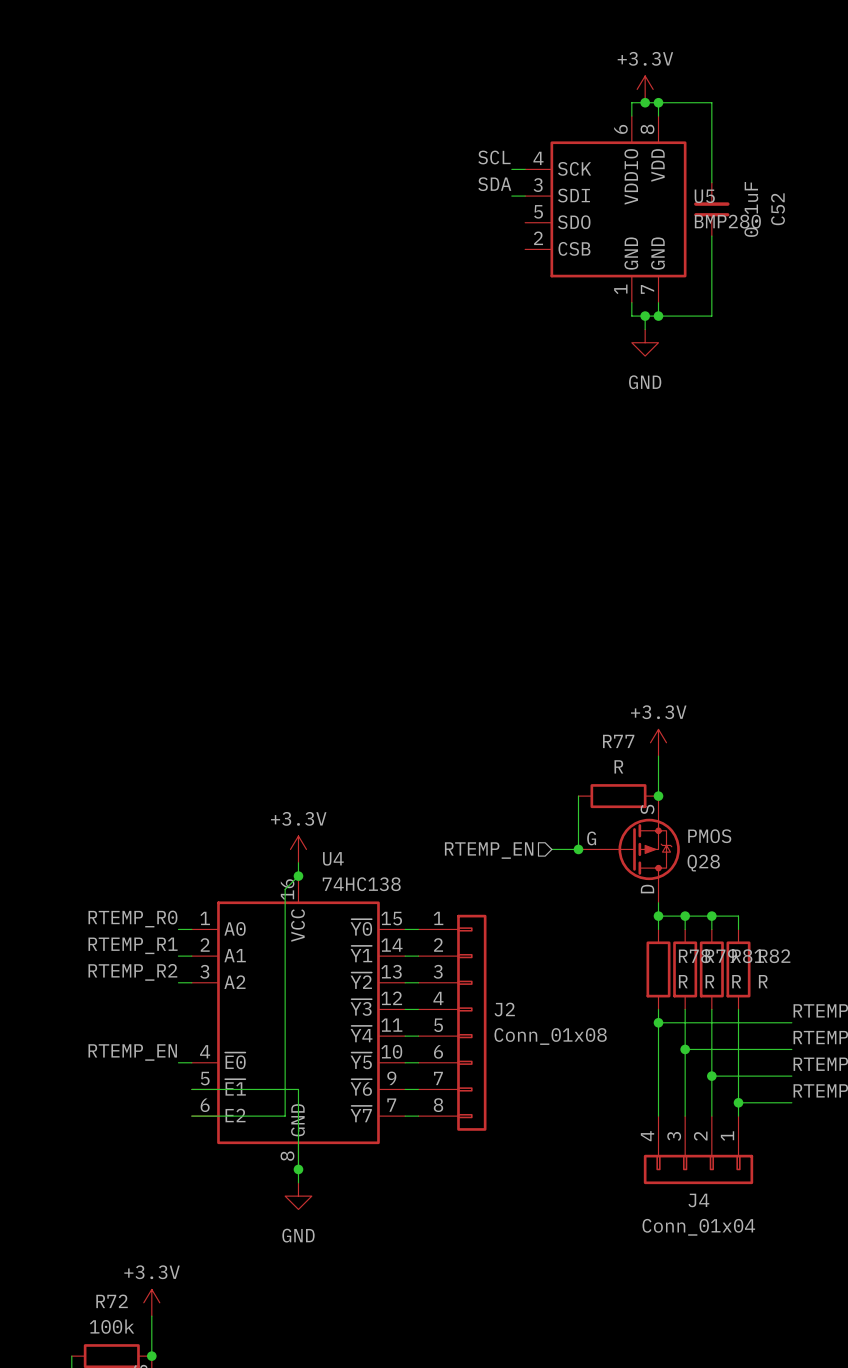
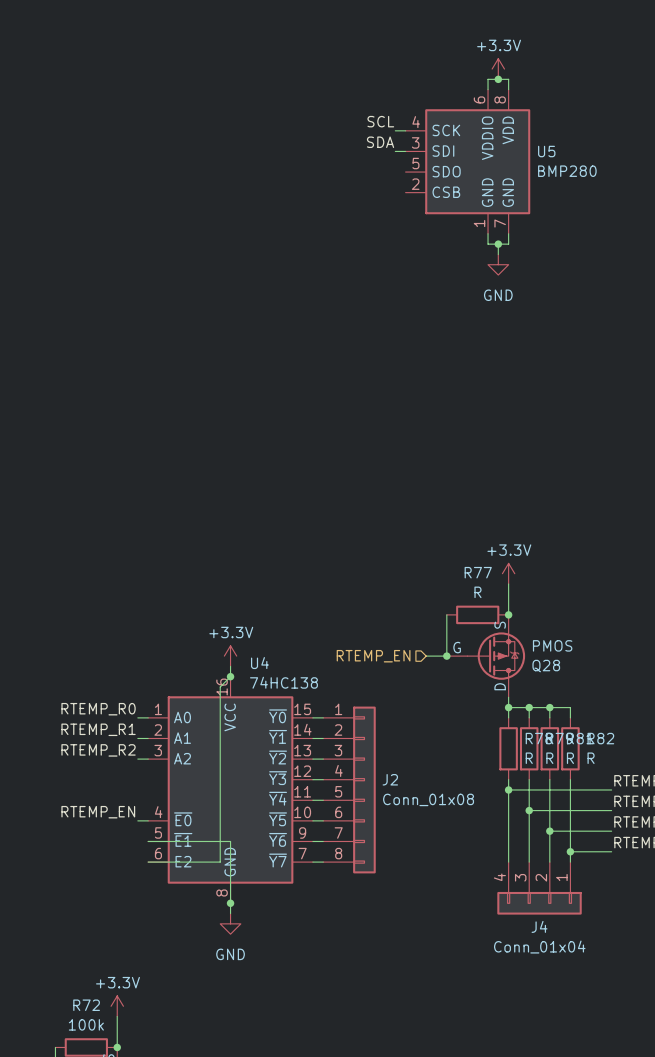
wire: (658, 102) (711, 102) (711, 182) -> none
junction: (658, 102) -> none
C52: 0.1uF (711, 209) -> none
wire: (711, 236) (711, 316) (658, 316) -> none
junction: (658, 316) -> none

